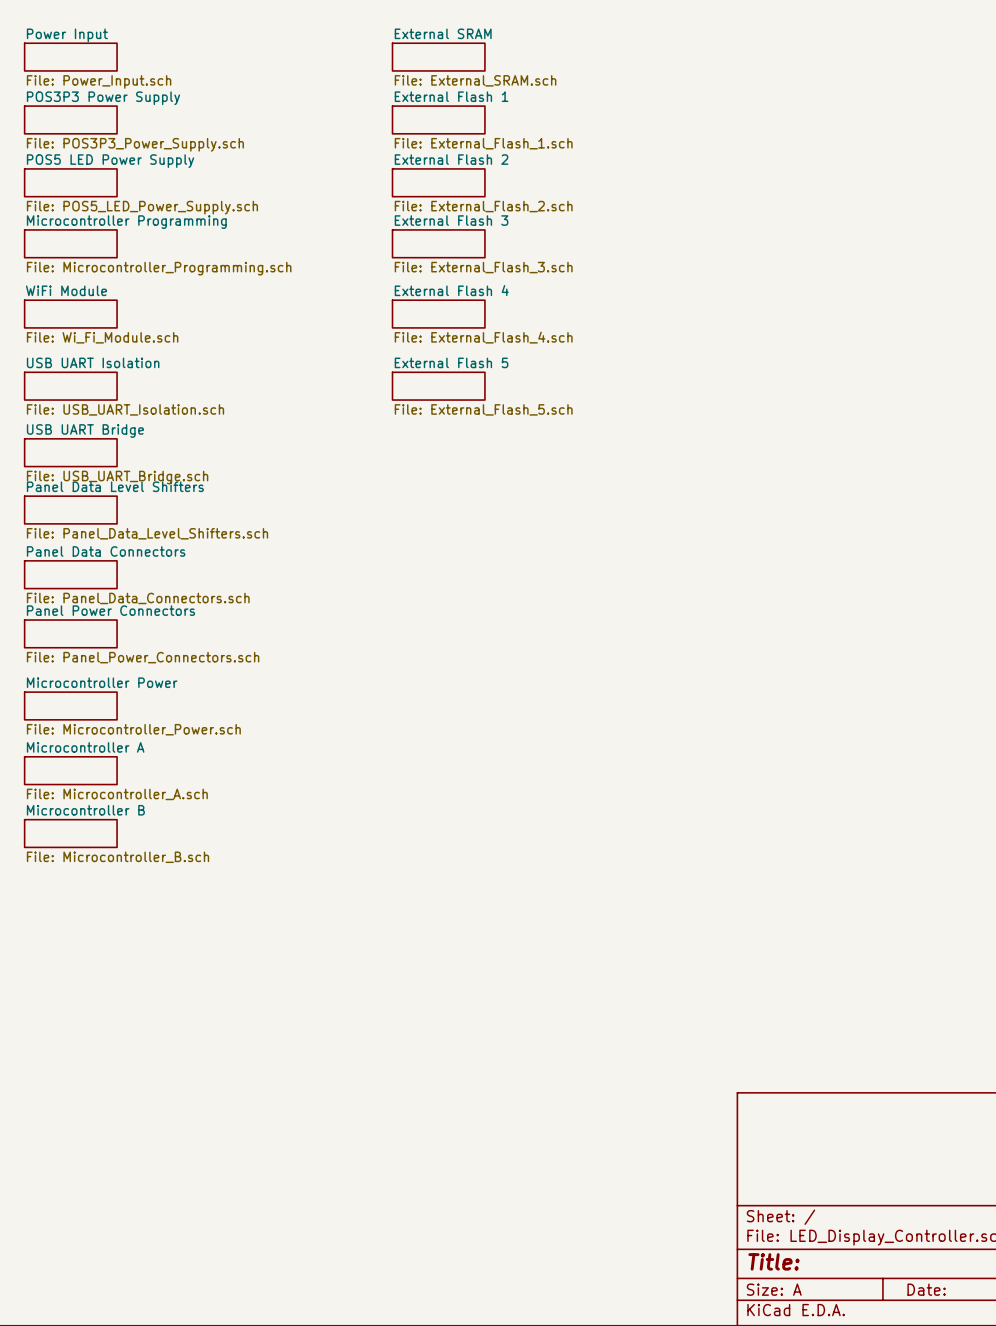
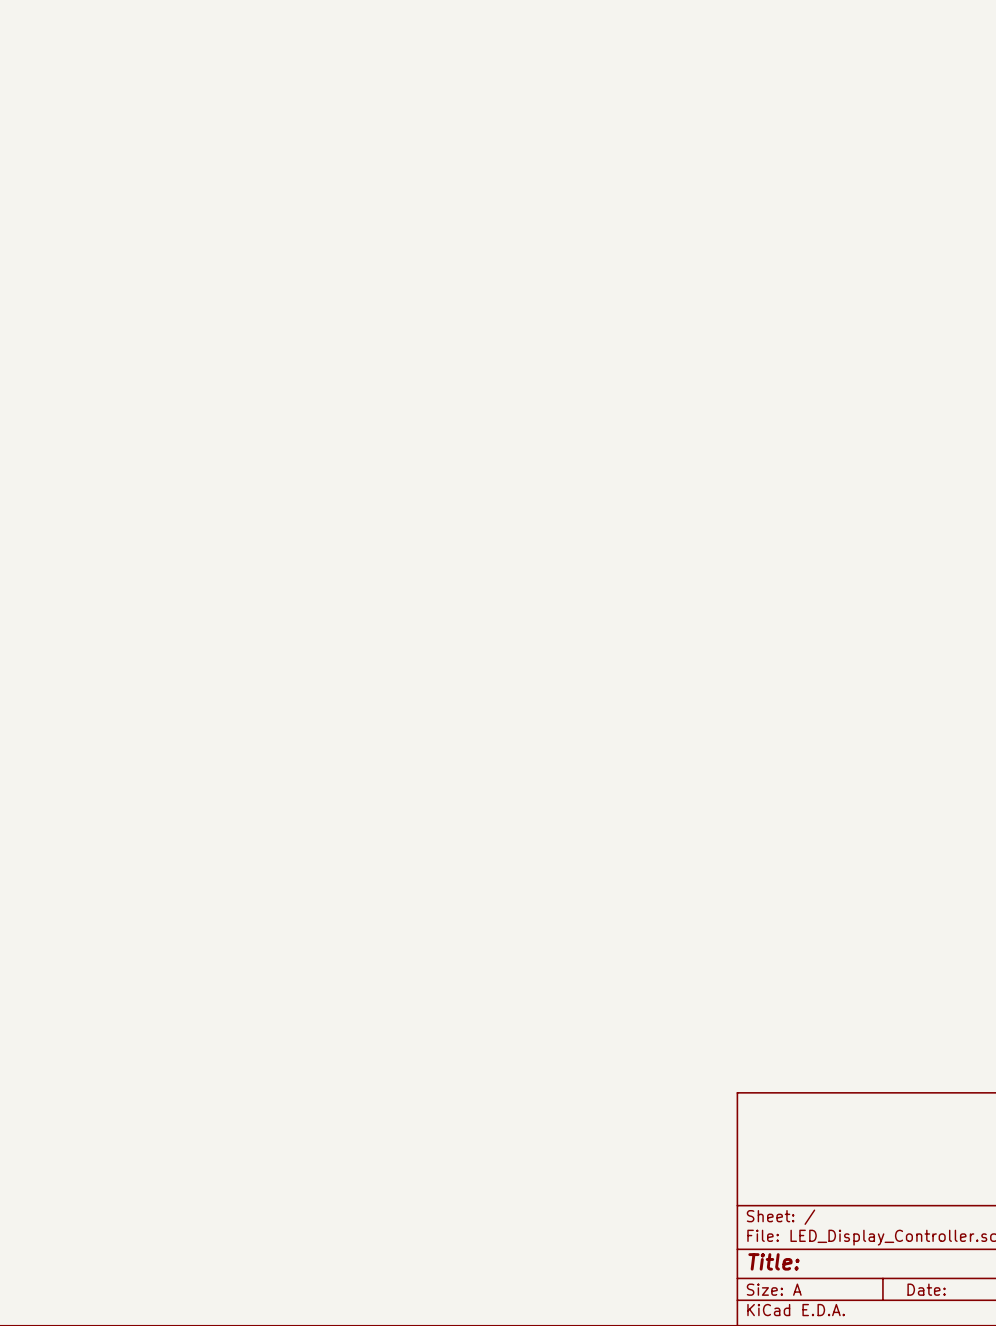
sheet Power Input: File: Power_Input.sch (70, 57) -> none
sheet External SRAM: File: External_SRAM.sch (438, 57) -> none
sheet POS3P3 Power Supply: File: POS3P3_Power_Supply.sch (70, 119) -> none
sheet External Flash 1: File: External_Flash_1.sch (438, 119) -> none
sheet POS5 LED Power Supply: File: POS5_LED_Power_Supply.sch (70, 182) -> none
sheet External Flash 2: File: External_Flash_2.sch (438, 182) -> none
sheet Microcontroller Programming: File: Microcontroller_Programming.sch (70, 243) -> none
sheet External Flash 3: File: External_Flash_3.sch (438, 243) -> none
sheet WiFi Module: File: Wi_Fi_Module.sch (70, 314) -> none
sheet External Flash 4: File: External_Flash_4.sch (438, 314) -> none
sheet USB UART Isolation: File: USB_UART_Isolation.sch (70, 386) -> none
sheet External Flash 5: File: External_Flash_5.sch (438, 386) -> none
sheet USB UART Bridge: File: USB_UART_Bridge.sch (70, 452) -> none
sheet Panel Data Level Shifters: File: Panel_Data_Level_Shifters.sch (70, 510) -> none
sheet Panel Data Connectors: File: Panel_Data_Connectors.sch (70, 574) -> none
sheet Panel Power Connectors: File: Panel_Power_Connectors.sch (70, 633) -> none
sheet Microcontroller Power: File: Microcontroller_Power.sch (70, 705) -> none
sheet Microcontroller A: File: Microcontroller_A.sch (70, 770) -> none
sheet Microcontroller B: File: Microcontroller_B.sch (70, 833) -> none

